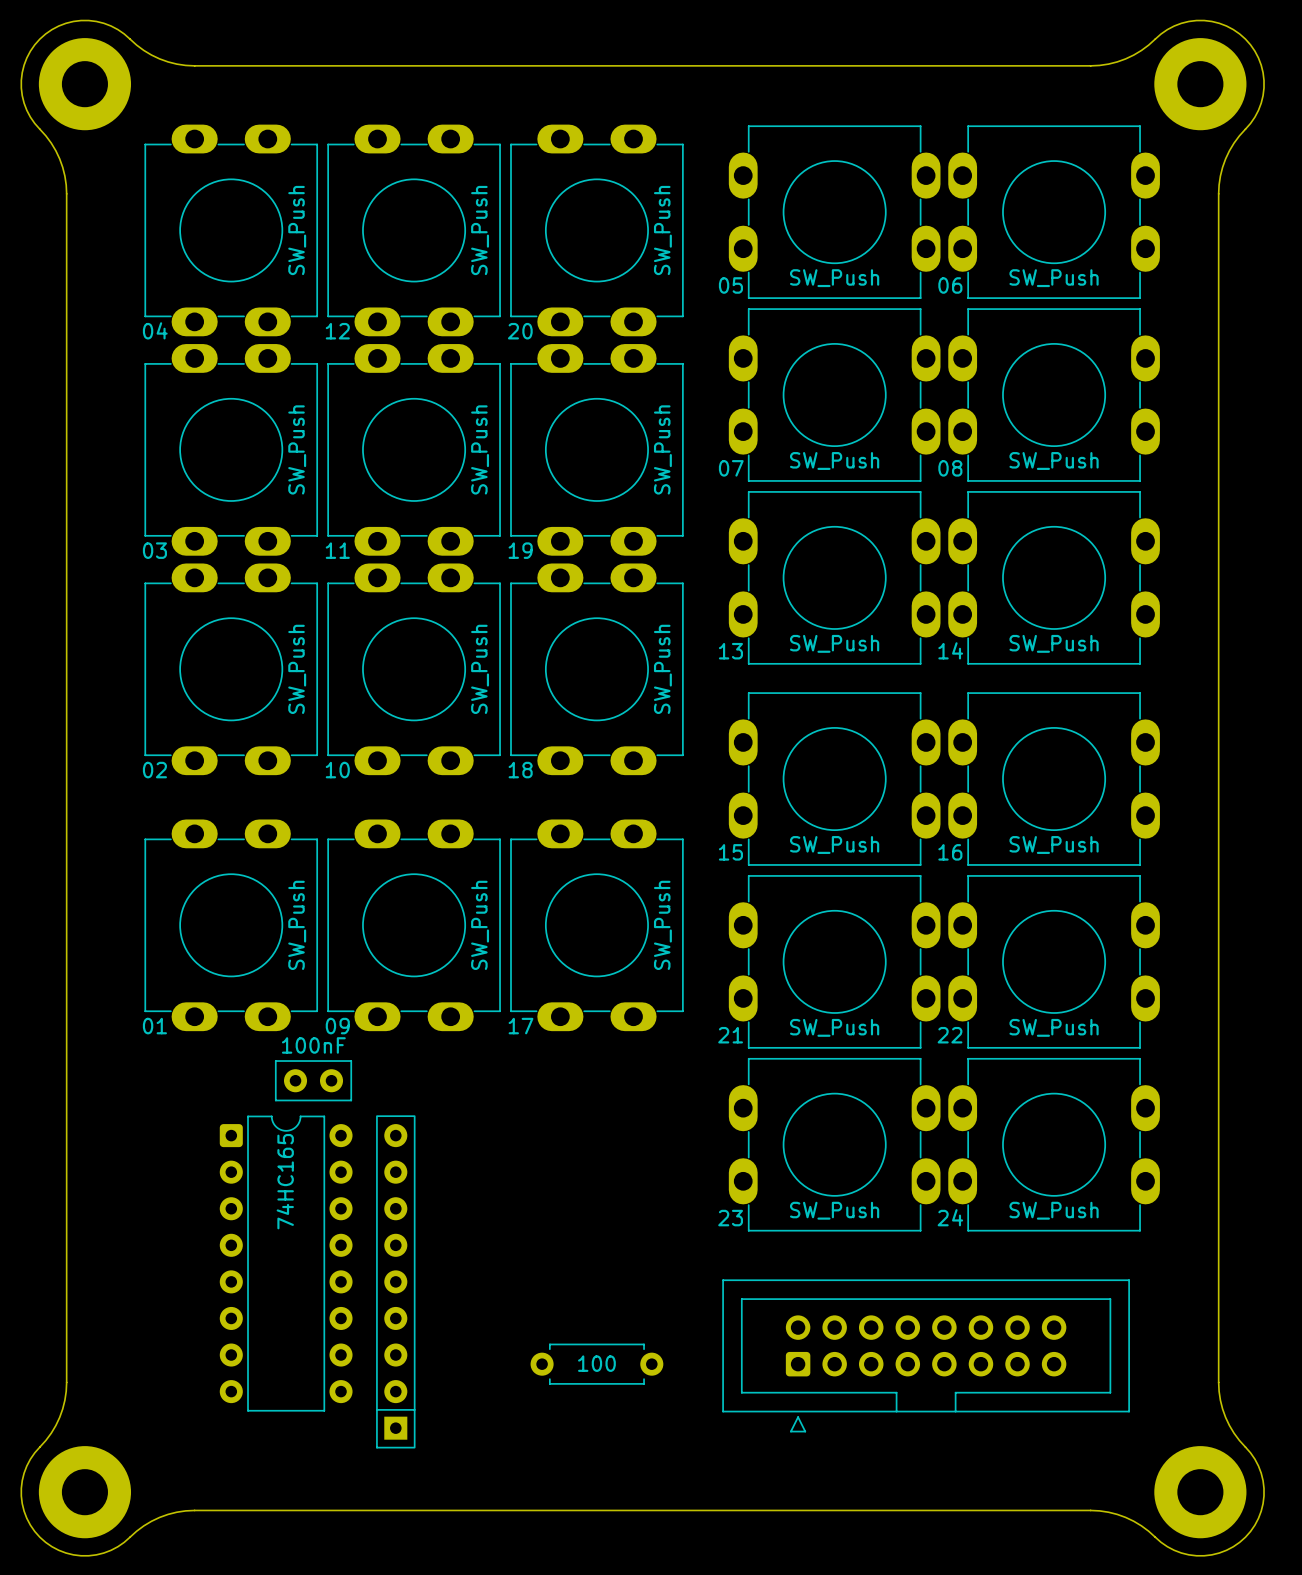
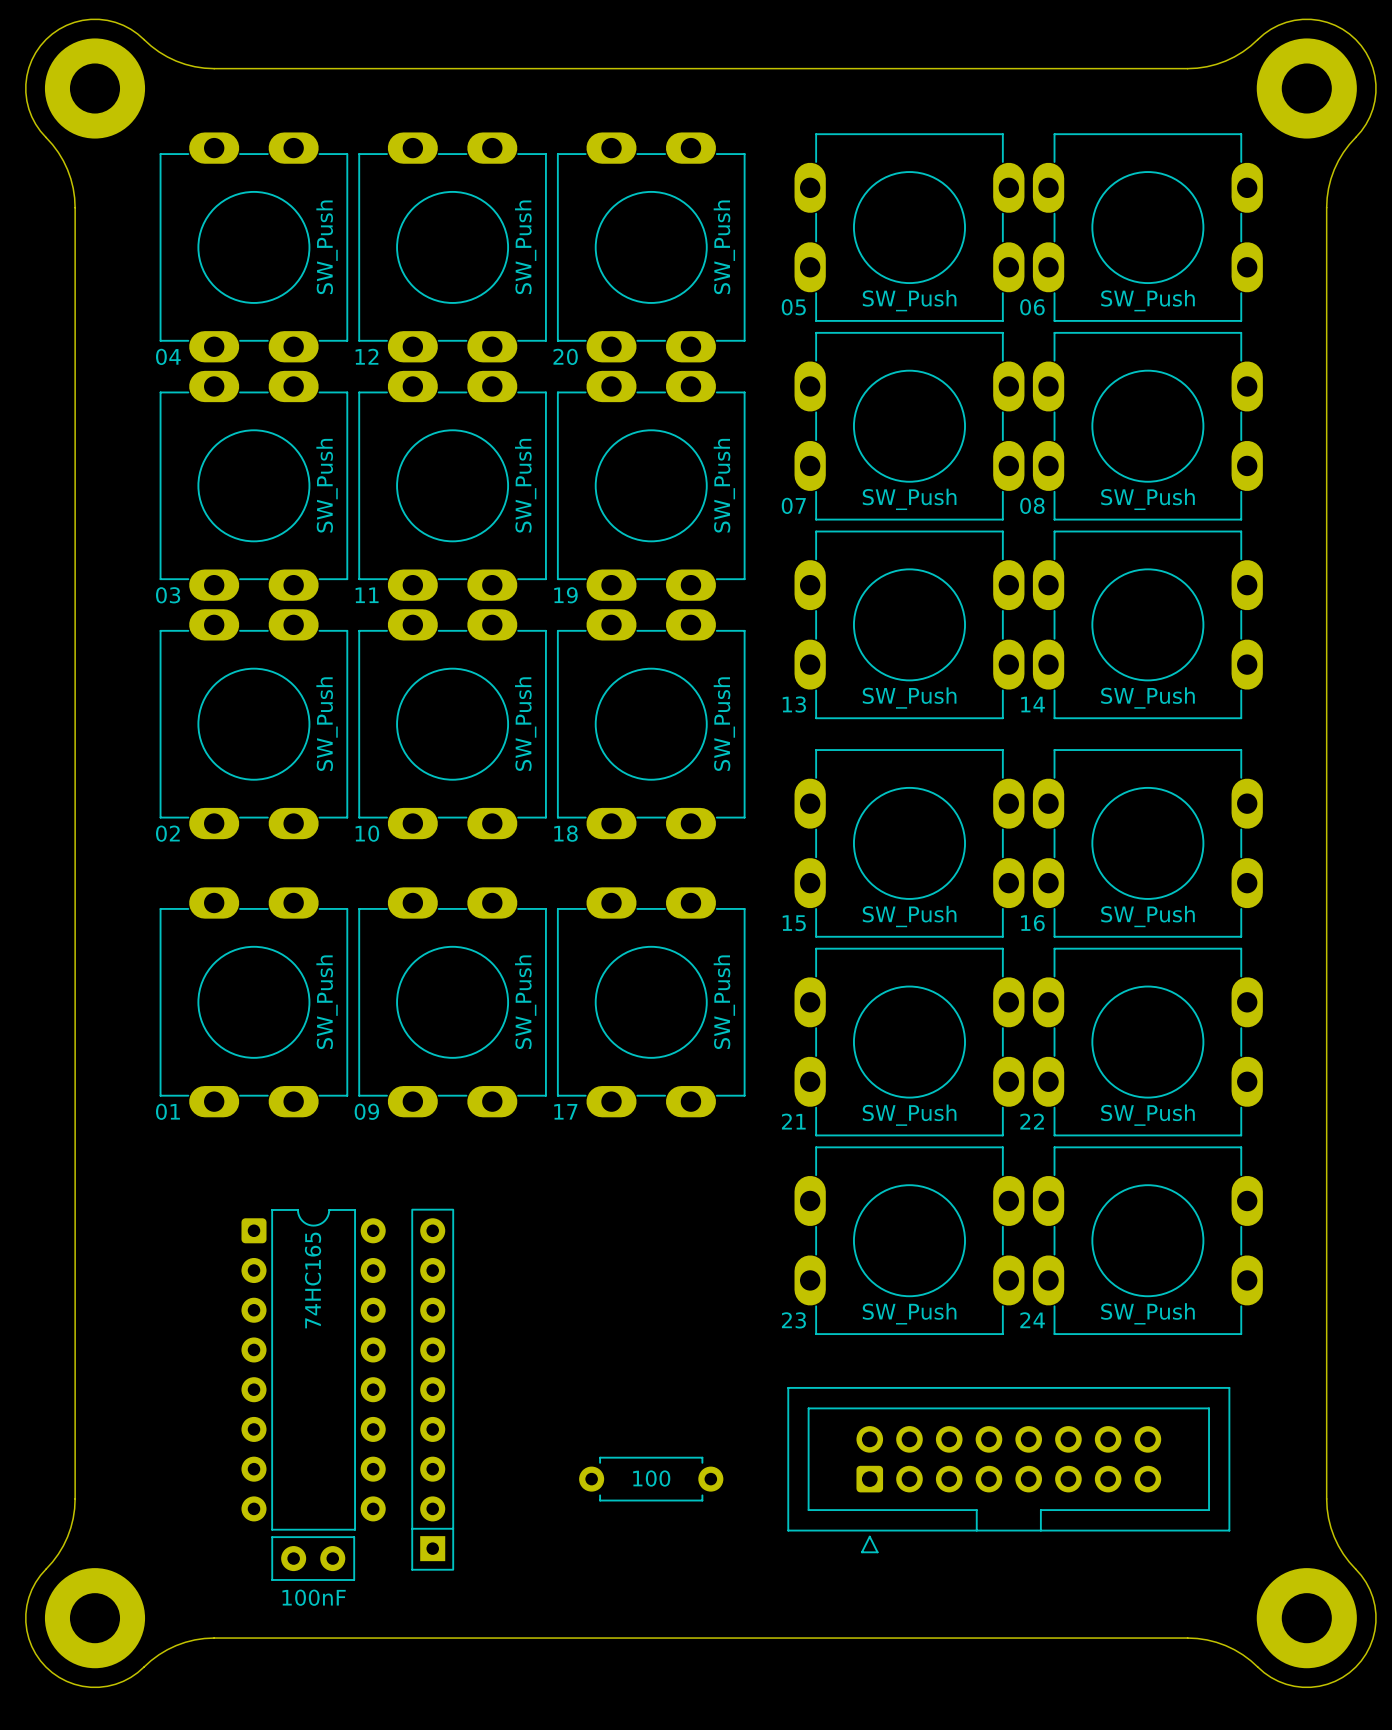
part value position: 100nF (313, 1045) -> 100nF (314, 1597)
part position: (313, 1080) -> (313, 1558)

